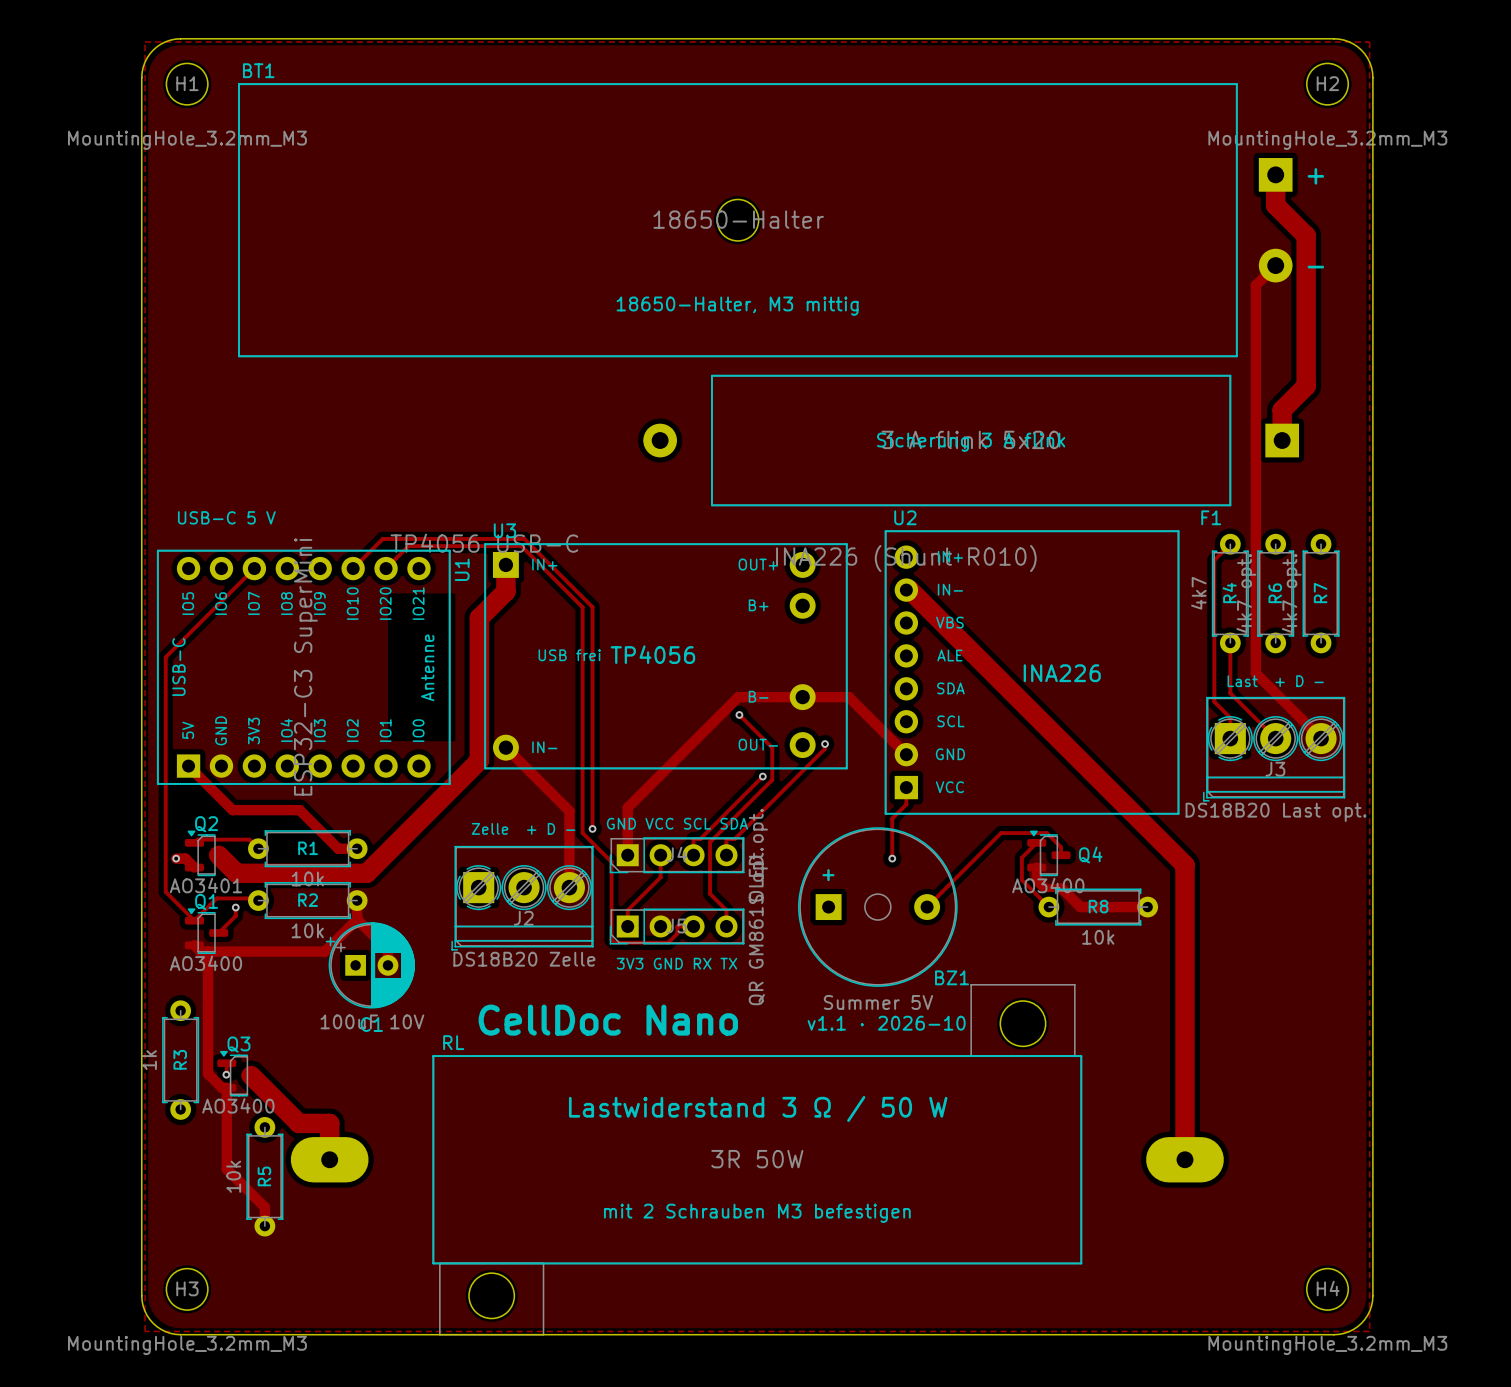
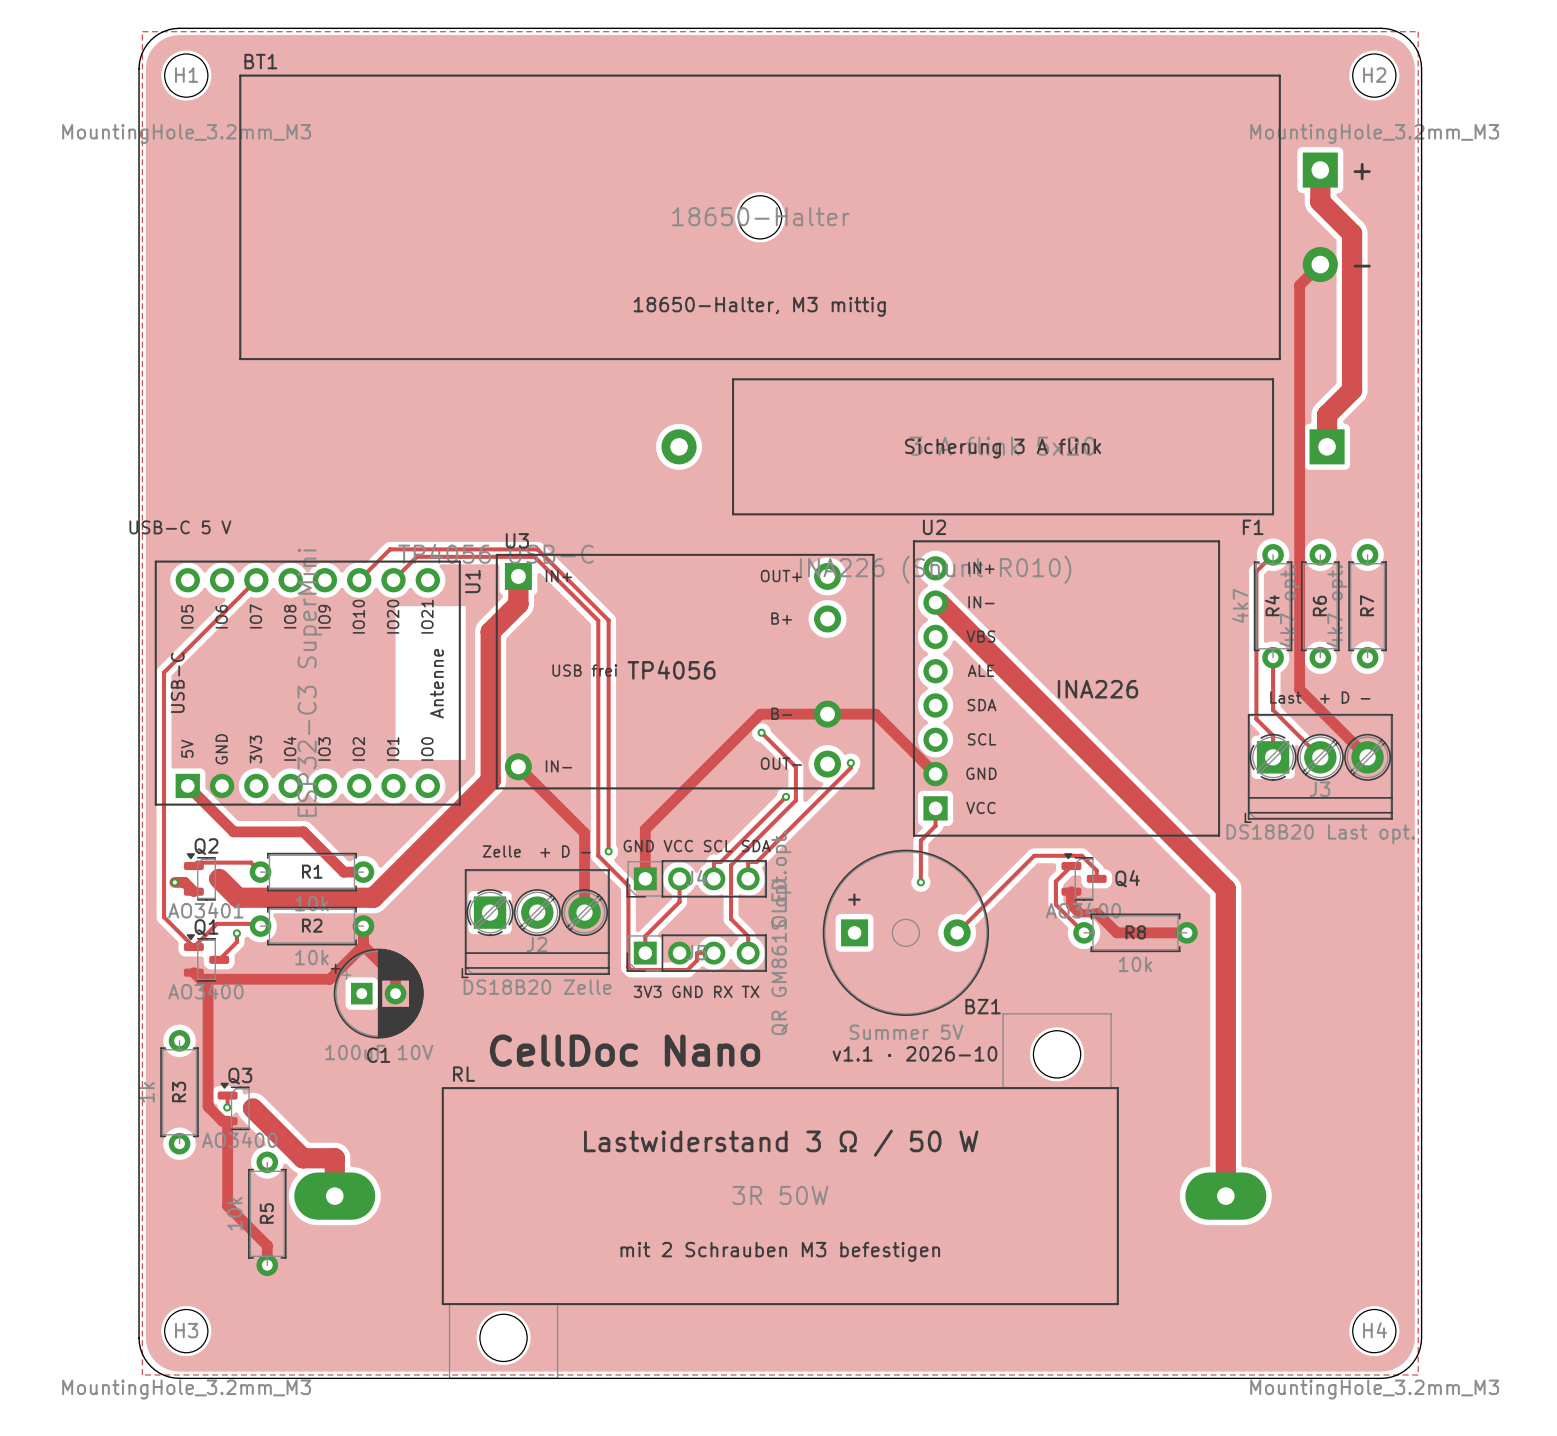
text position: USB-C 5 V (226, 517) -> USB-C 5 V (180, 527)

